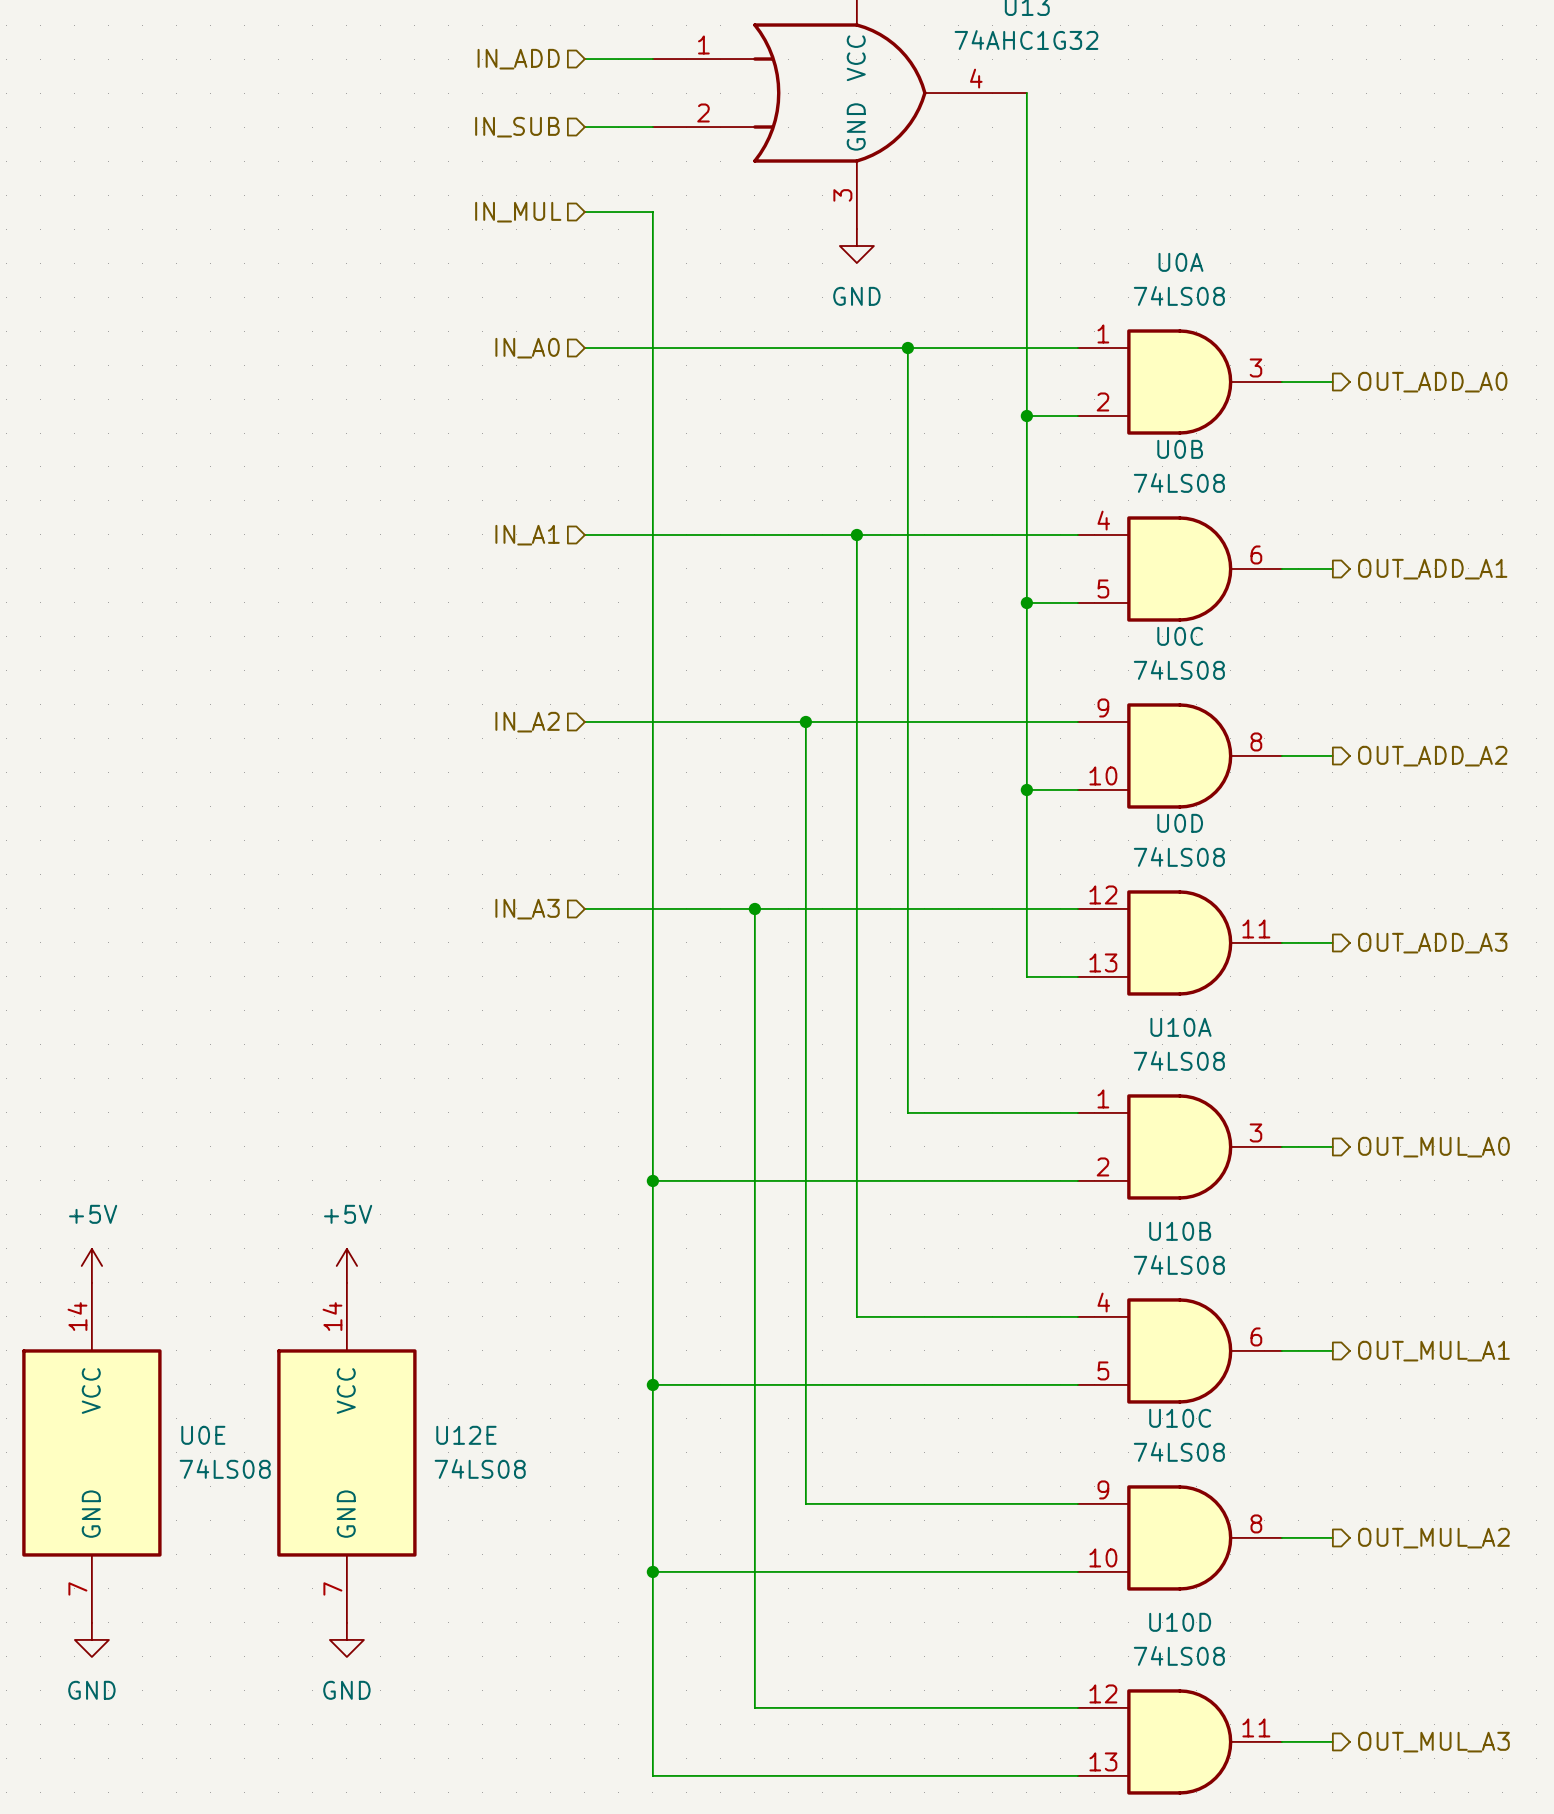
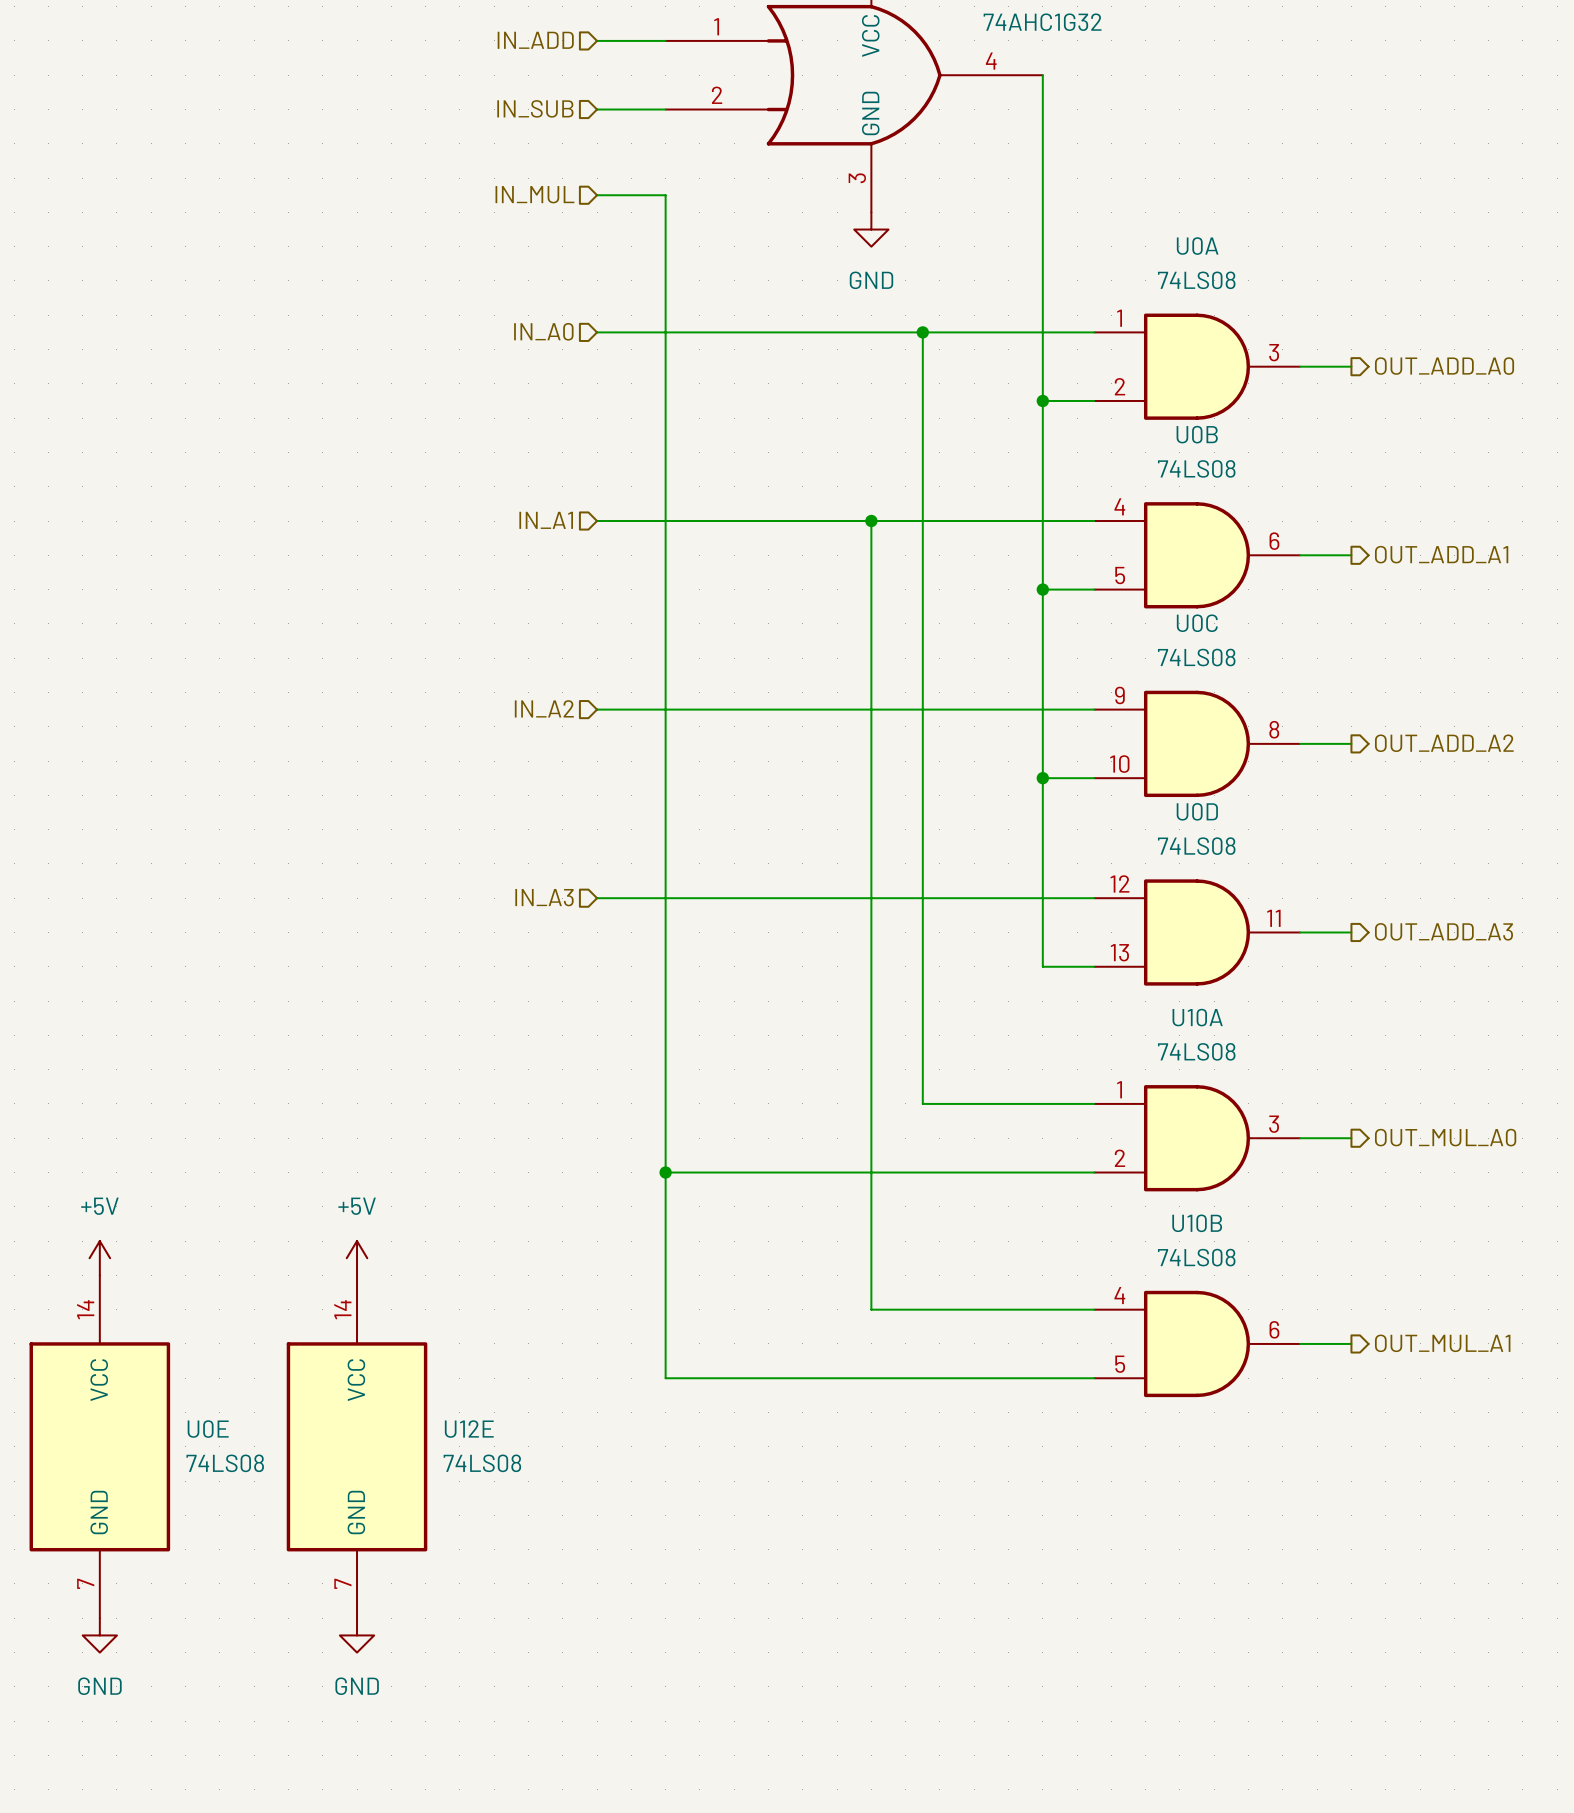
wire: (805, 721) (805, 1503) (1077, 1503) -> none
junction: (805, 721) -> none
wire: (754, 908) (754, 1707) (1077, 1707) -> none
junction: (754, 908) -> none
wire: (652, 1384) (652, 1775) (1077, 1775) -> none
junction: (652, 1384) -> none
U10C: 74LS08 (1179, 1537) -> none
wire: (1281, 1537) (1332, 1537) -> none
hierarchical label: OUT_MUL_A2 (1433, 1538) -> none
wire: (652, 1571) (1077, 1571) -> none
junction: (652, 1571) -> none
U10D: 74LS08 (1179, 1741) -> none
wire: (1281, 1741) (1332, 1741) -> none
hierarchical label: OUT_MUL_A3 (1433, 1742) -> none

